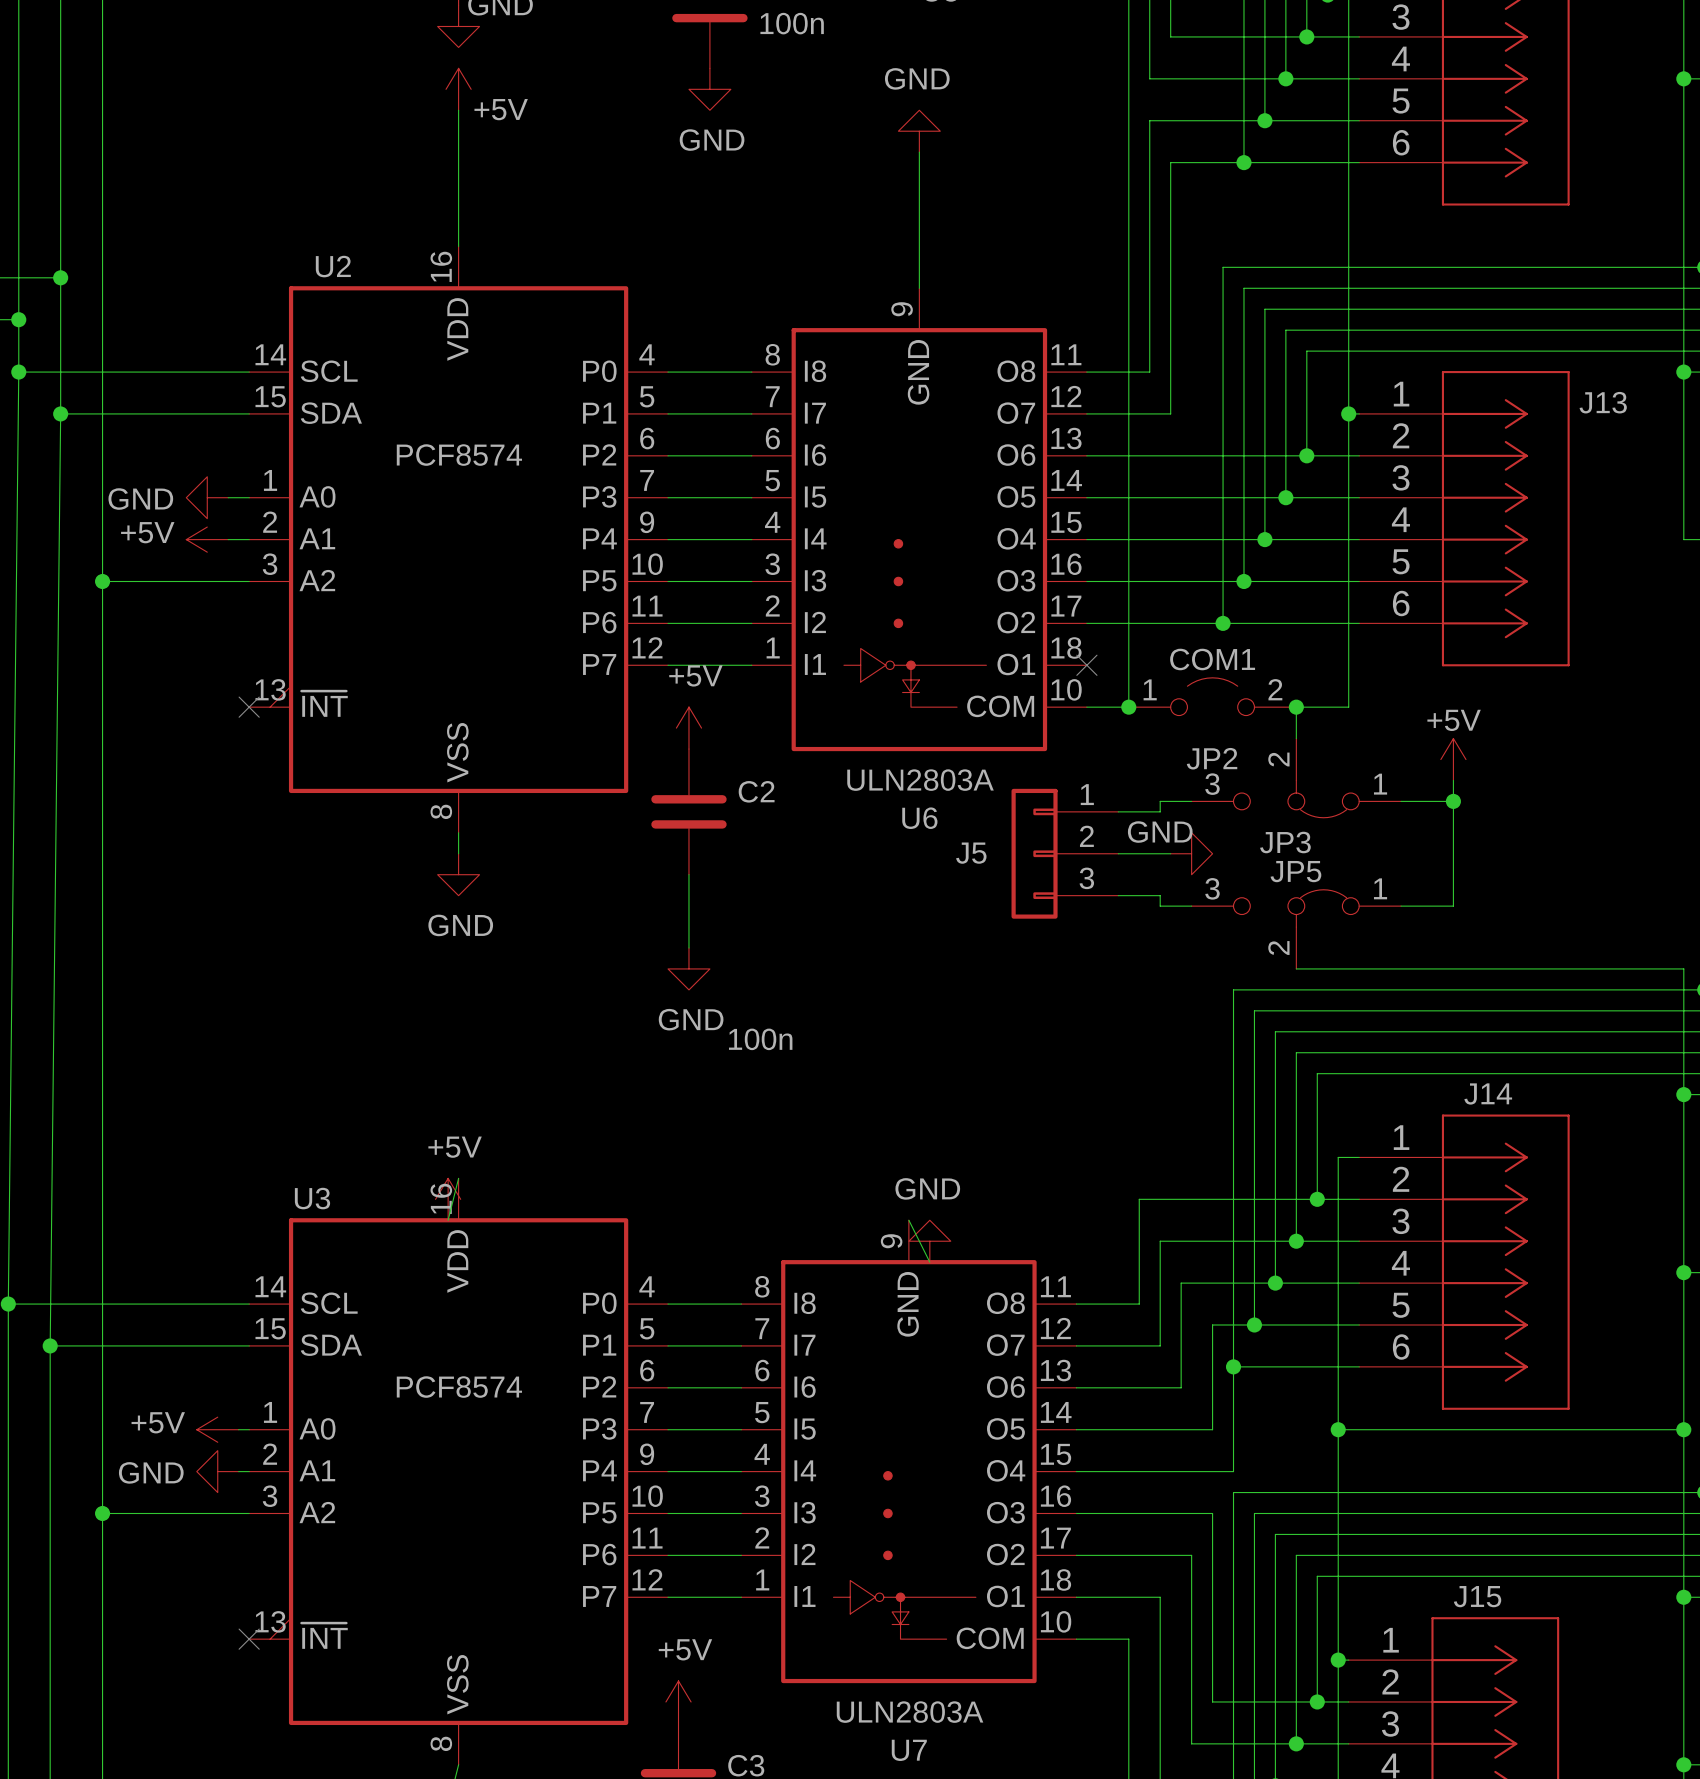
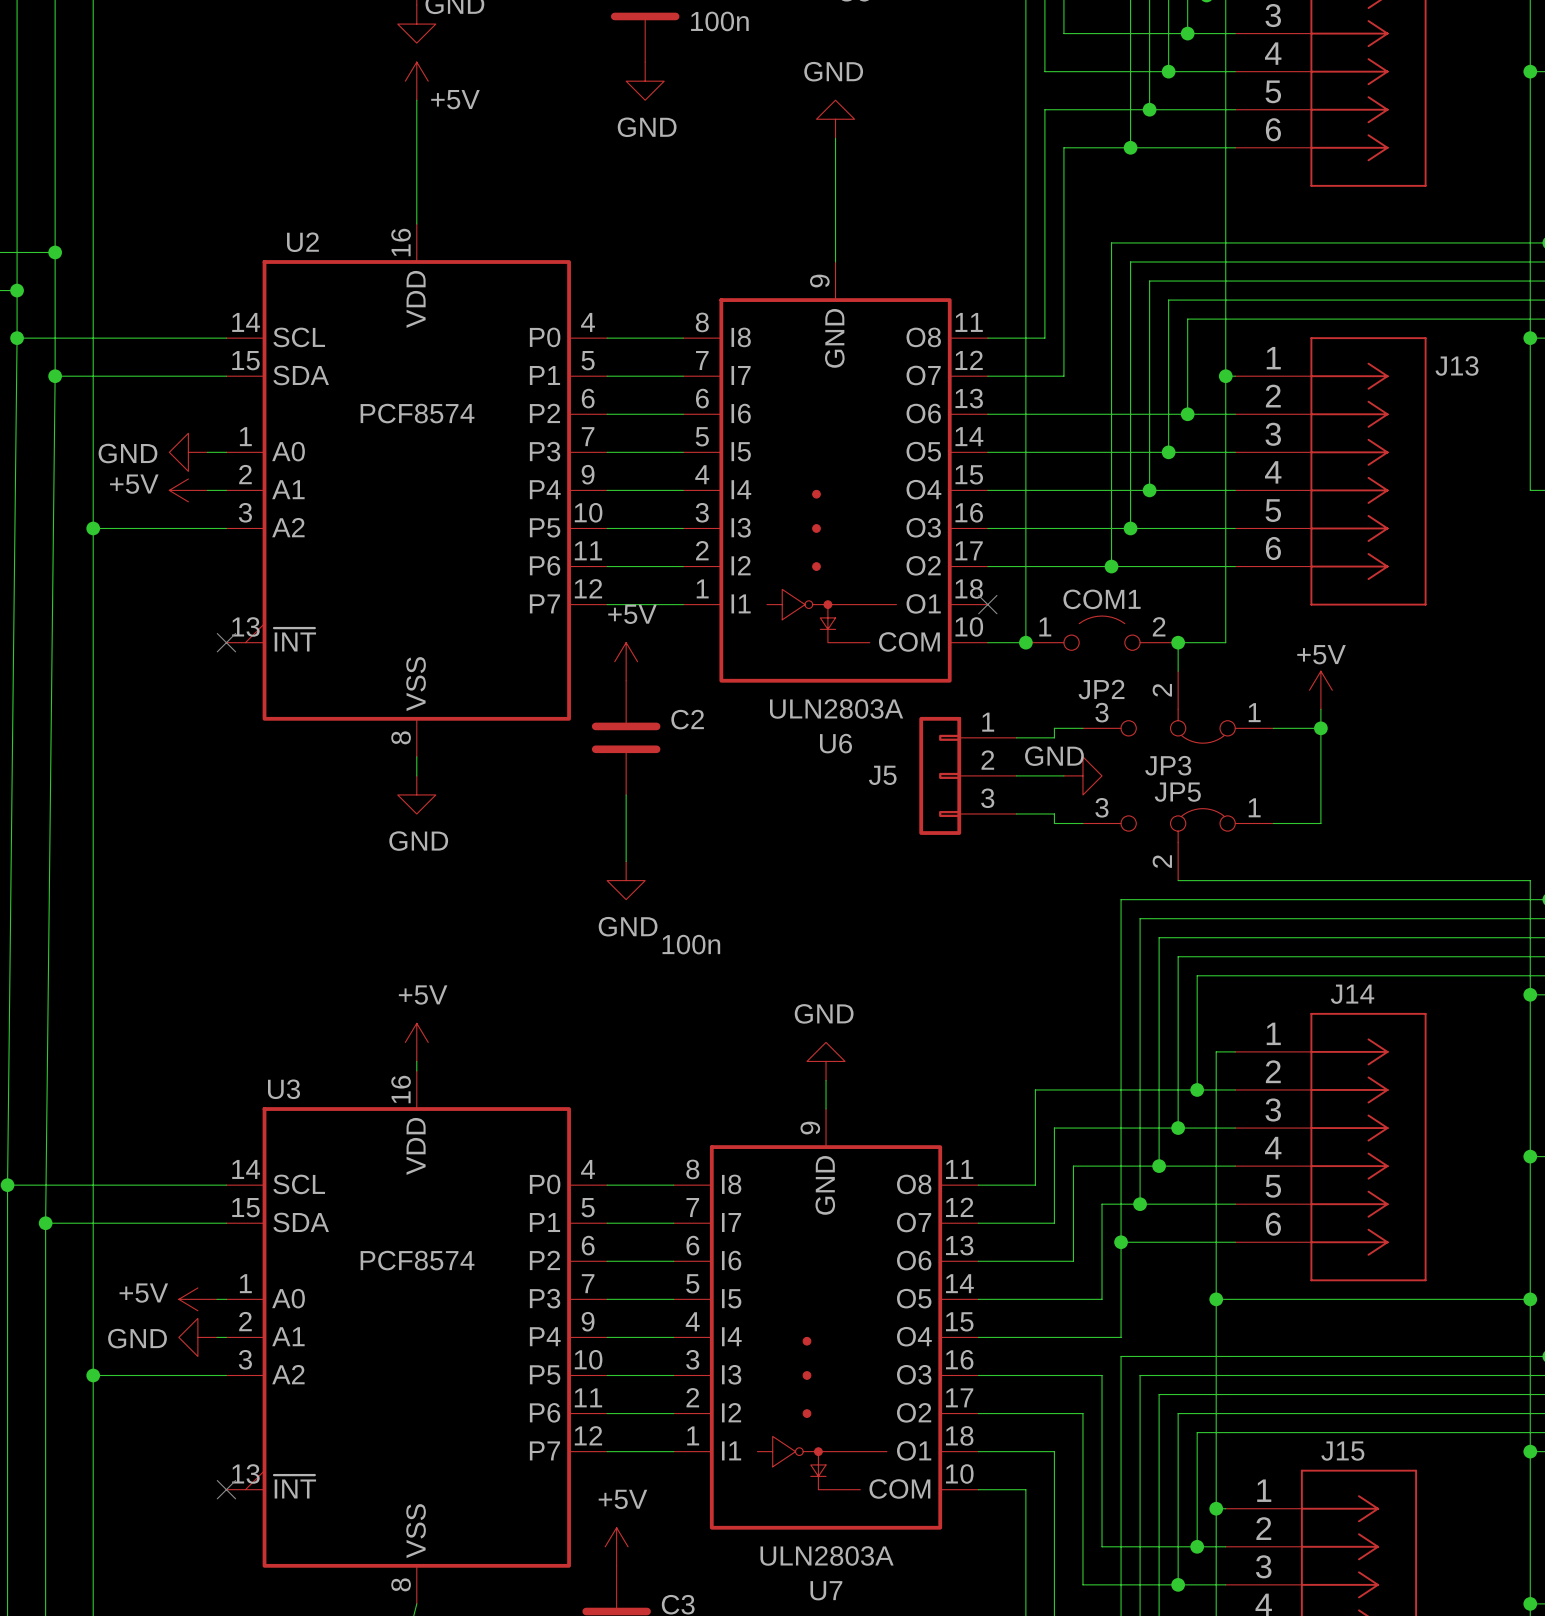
wire: (458, 1178) (448, 1220) -> (416, 1070) (416, 1061)
power symbol position: +5V (448, 1199) -> +5V (416, 1042)
wire: (908, 1220) (929, 1262) -> (826, 1109) (826, 1080)
power symbol position: GND (929, 1241) -> GND (826, 1061)

